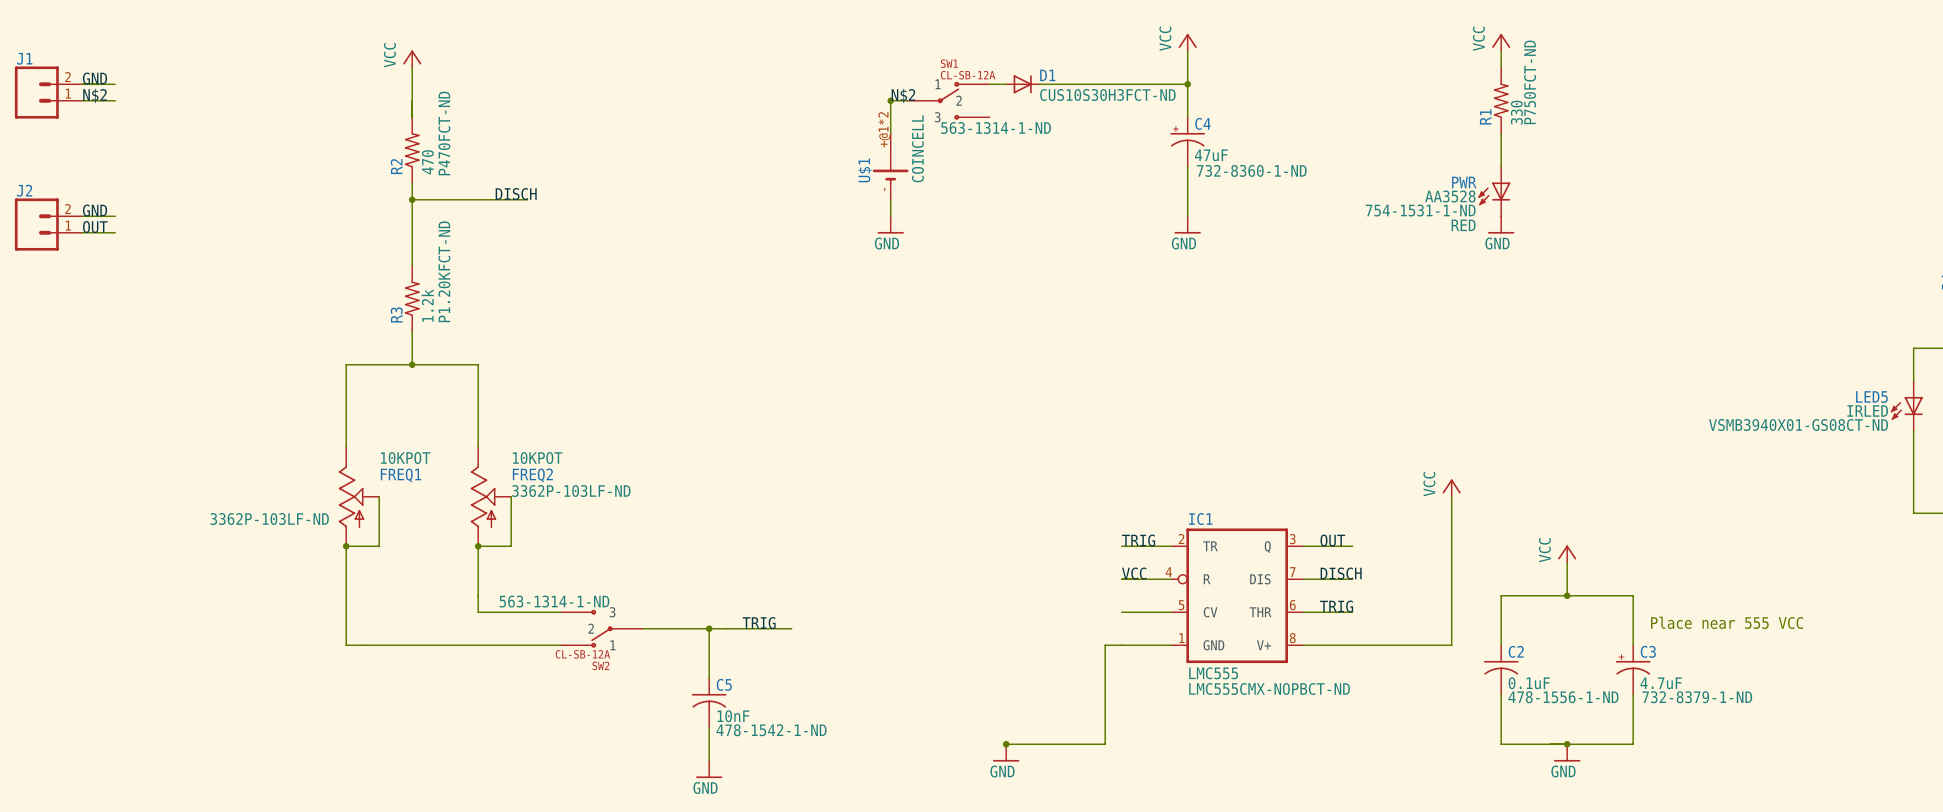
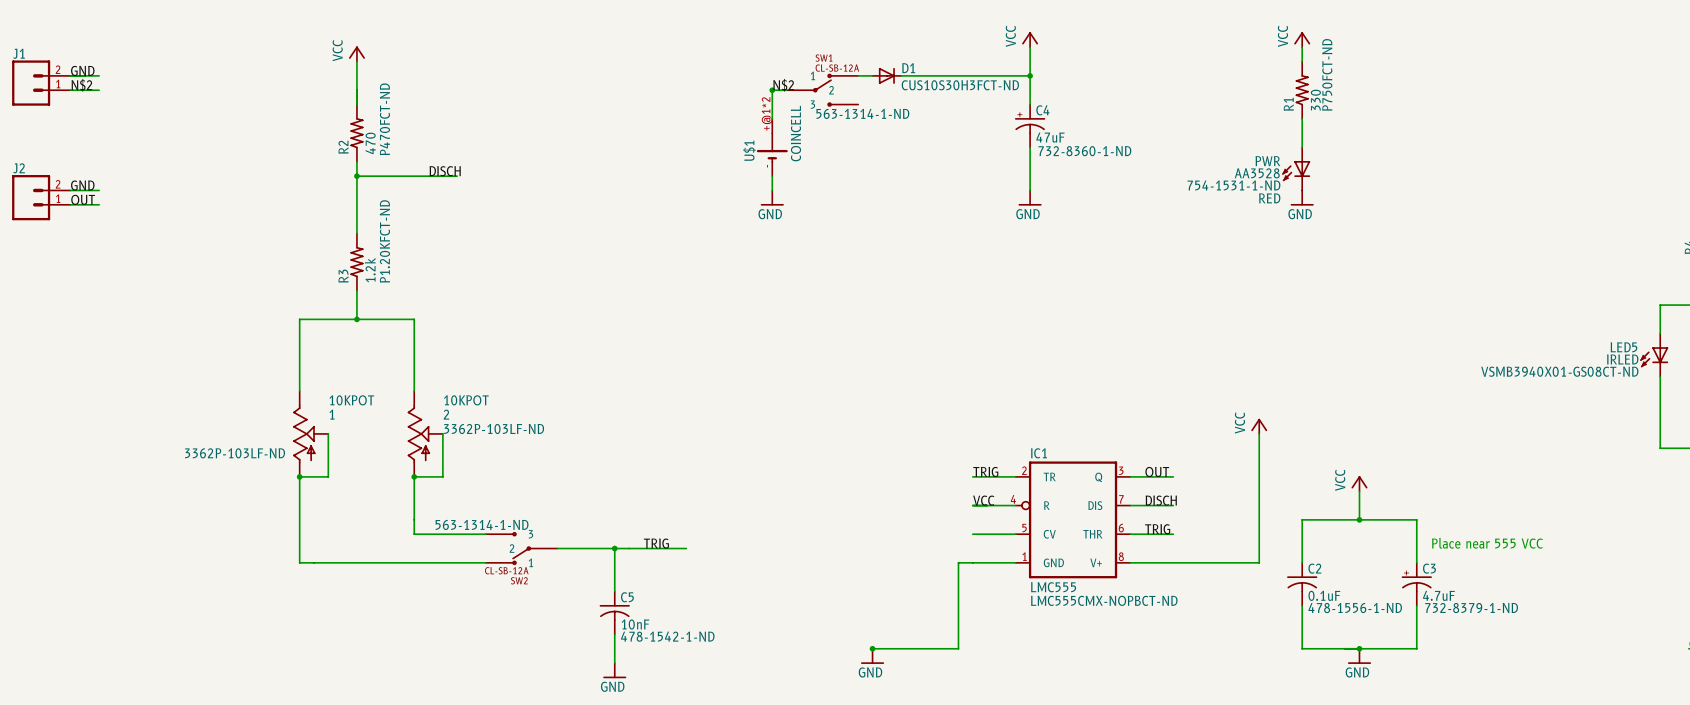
FREQ1 name: FREQ1 (401, 475) -> 1 (332, 414)
FREQ2 name: FREQ2 (532, 475) -> 2 (446, 414)

